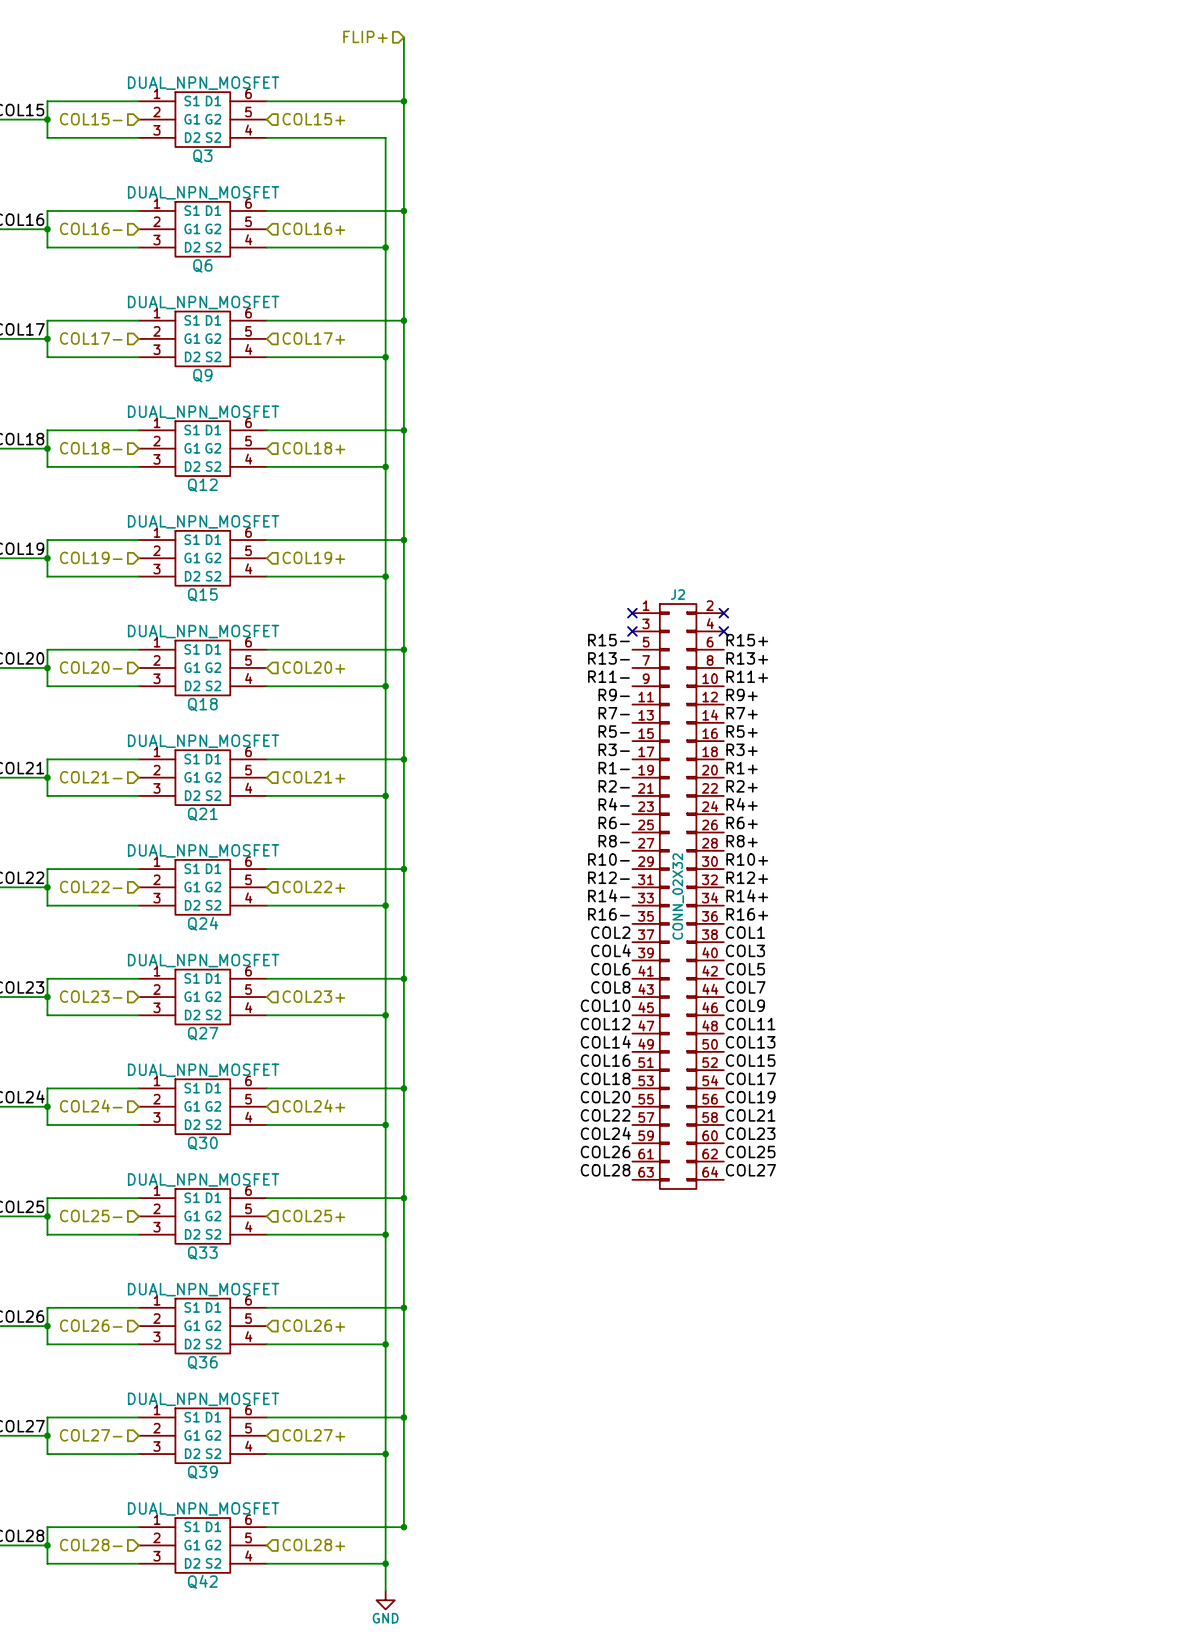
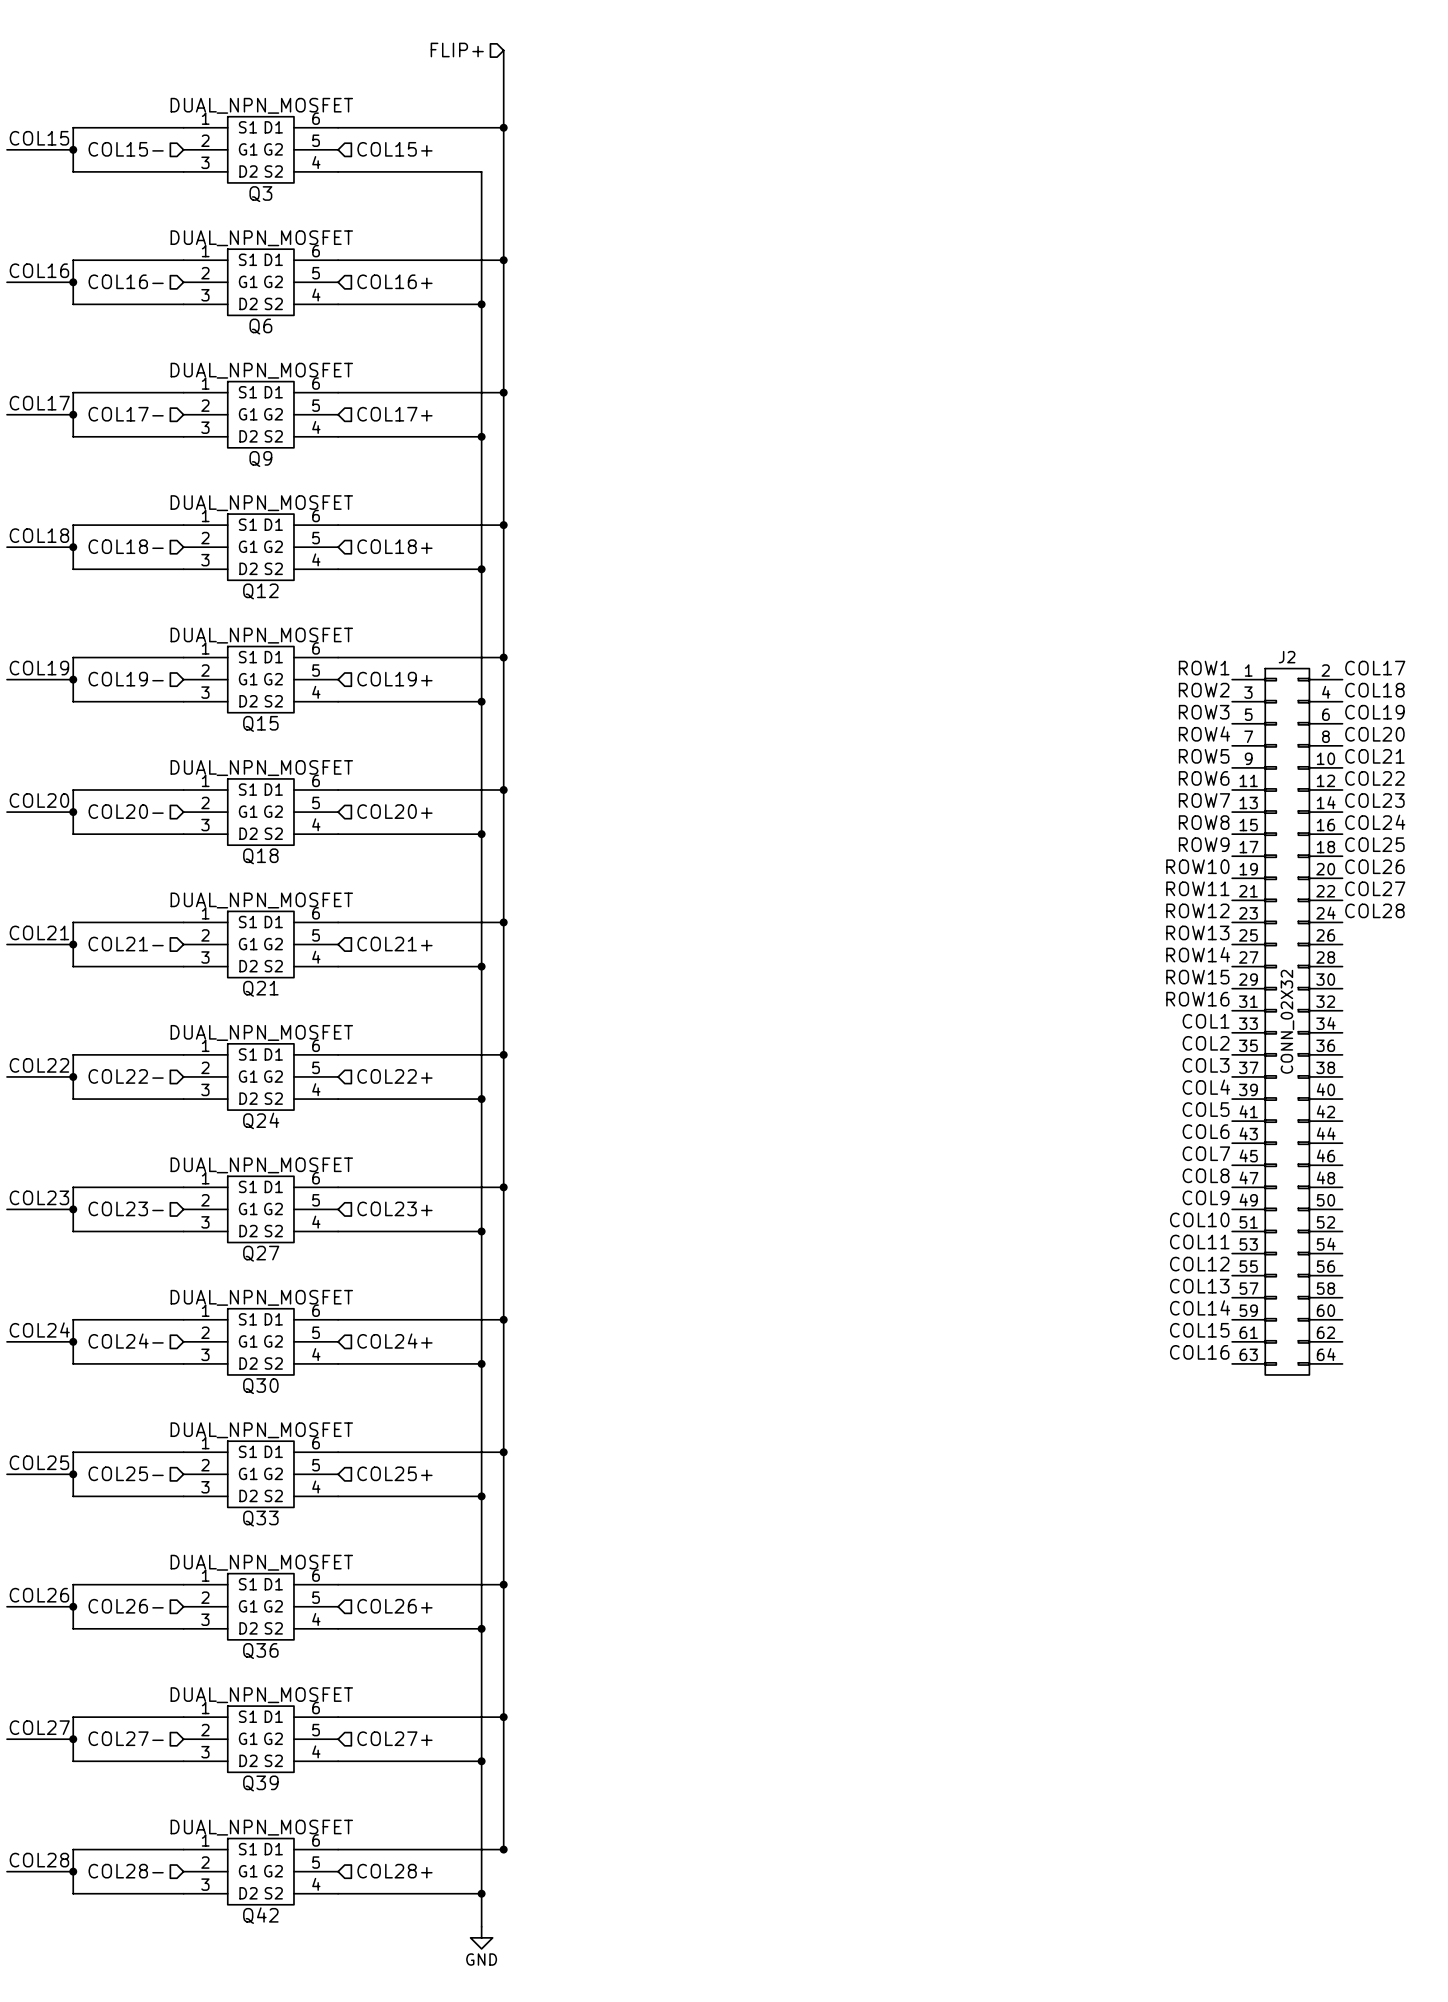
label: none -> ROW1 (1204, 668)
label: none -> COL17 (1375, 668)
label: none -> ROW2 (1204, 690)
label: none -> COL18 (1374, 690)
label: none -> ROW3 (1204, 712)
label: none -> COL19 (1374, 712)
label: none -> ROW4 (1204, 733)
label: none -> COL20 (1374, 734)
no-connect mark: (632, 613) -> none
no-connect mark: (723, 613) -> none
label: none -> ROW5 (1204, 756)
label: none -> COL21 (1374, 756)
no-connect mark: (632, 631) -> none
no-connect mark: (723, 631) -> none
label: R15- (608, 640) -> none
label: R15+ (747, 640) -> none
label: none -> ROW6 (1204, 778)
label: none -> COL22 (1374, 778)
label: R13- (608, 658) -> none
label: R13+ (747, 658) -> none
label: none -> ROW7 (1204, 800)
label: none -> COL23 (1374, 800)
label: R11- (608, 676) -> none
label: R11+ (747, 676) -> none
label: none -> ROW8 (1204, 822)
label: none -> COL24 (1375, 822)
label: R9- (614, 694) -> none
label: R9+ (742, 694) -> none
label: none -> ROW9 (1204, 844)
label: none -> COL25 (1374, 844)
label: R7- (614, 713) -> none
label: R7+ (742, 713) -> none
label: none -> ROW10 (1197, 866)
label: none -> COL26 (1374, 866)
label: R5- (614, 731) -> none
label: R5+ (742, 731) -> none
label: none -> ROW11 (1197, 888)
label: none -> COL27 (1375, 888)
label: R3- (614, 749) -> none
label: R3+ (742, 749) -> none
label: none -> ROW12 (1197, 910)
label: none -> COL28 (1374, 910)
label: R1- (614, 768) -> none
label: R1+ (742, 768) -> none
label: none -> ROW13 (1197, 932)
label: R2- (614, 786) -> none
label: R2+ (742, 786) -> none
label: none -> ROW14 (1198, 954)
label: R4- (614, 804) -> none
label: R4+ (742, 804) -> none
label: none -> ROW15 (1197, 977)
label: R6- (614, 822) -> none
label: R6+ (742, 822) -> none
label: none -> ROW16 (1197, 999)
label: R8- (614, 841) -> none
label: R8+ (742, 841) -> none
label: none -> COL1 (1206, 1021)
label: R10- (608, 859) -> none
label: R10+ (747, 859) -> none
label: none -> COL2 (1206, 1043)
label: R12- (608, 877) -> none
label: R12+ (747, 877) -> none
label: none -> COL3 (1206, 1065)
label: R14- (608, 895) -> none
label: R14+ (747, 895) -> none
label: none -> COL4 (1206, 1087)
J2 position: (678, 896) -> (1287, 1021)
label: R16- (608, 914) -> none
label: R16+ (747, 914) -> none
label: none -> COL5 (1206, 1109)
label: COL2 (610, 932) -> none
label: COL1 (745, 932) -> none
label: none -> COL6 (1206, 1131)
label: COL4 (611, 950) -> none
label: COL3 (745, 950) -> none
label: none -> COL7 (1206, 1153)
label: COL6 (610, 969) -> none
label: COL5 (745, 969) -> none
label: none -> COL8 (1206, 1175)
label: COL8 (610, 987) -> none
label: COL7 (745, 987) -> none
label: none -> COL9 (1206, 1197)
label: COL10 (605, 1005) -> none
label: COL9 (745, 1005) -> none
label: none -> COL10 (1199, 1219)
label: COL12 (605, 1024) -> none
label: COL11 (750, 1024) -> none
label: none -> COL11 (1199, 1242)
label: COL14 (605, 1042) -> none
label: COL13 (750, 1042) -> none
label: none -> COL12 (1199, 1264)
label: COL16 (605, 1060) -> none
label: COL15 (750, 1060) -> none
label: none -> COL13 (1199, 1286)
label: COL18 (605, 1078) -> none
label: COL17 (750, 1078) -> none
label: none -> COL14 (1200, 1307)
label: COL20 (605, 1097) -> none
label: COL19 (750, 1097) -> none
label: none -> COL15 (1199, 1330)
label: COL22 (605, 1115) -> none
label: COL21 (750, 1115) -> none
label: none -> COL16 (1199, 1352)
label: COL24 (605, 1133) -> none
label: COL23 (750, 1133) -> none
label: COL26 (605, 1151) -> none
label: COL25 (750, 1151) -> none
label: COL28 (605, 1170) -> none
label: COL27 (750, 1170) -> none

